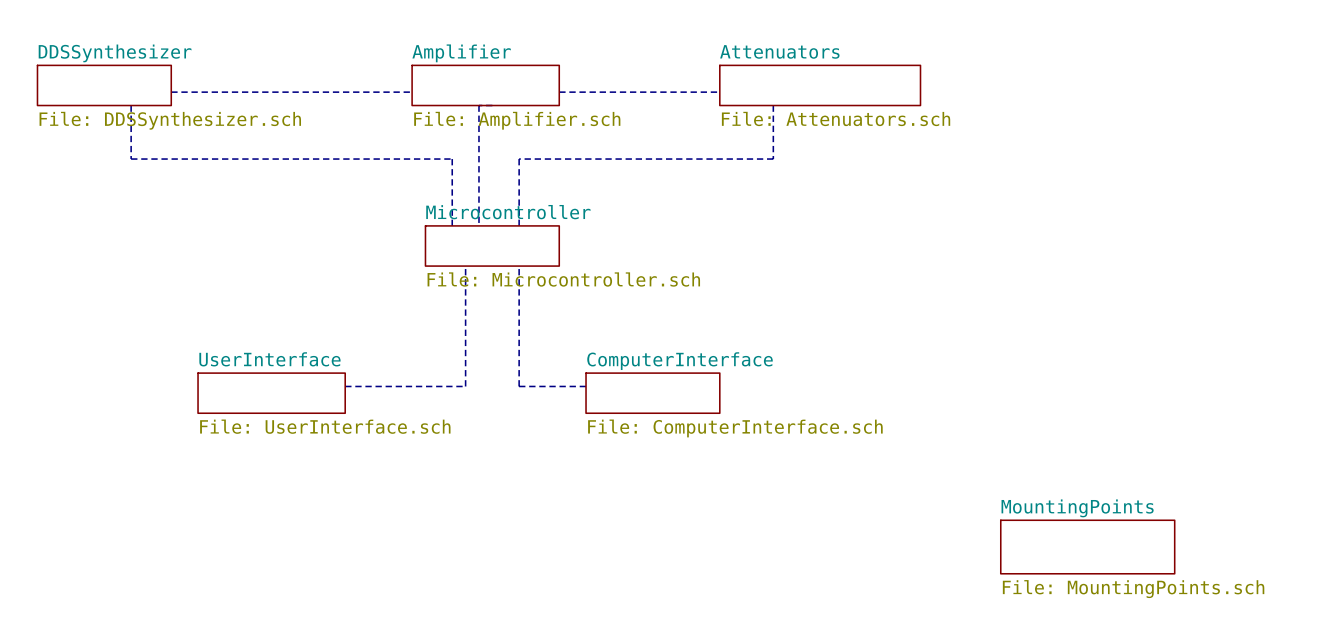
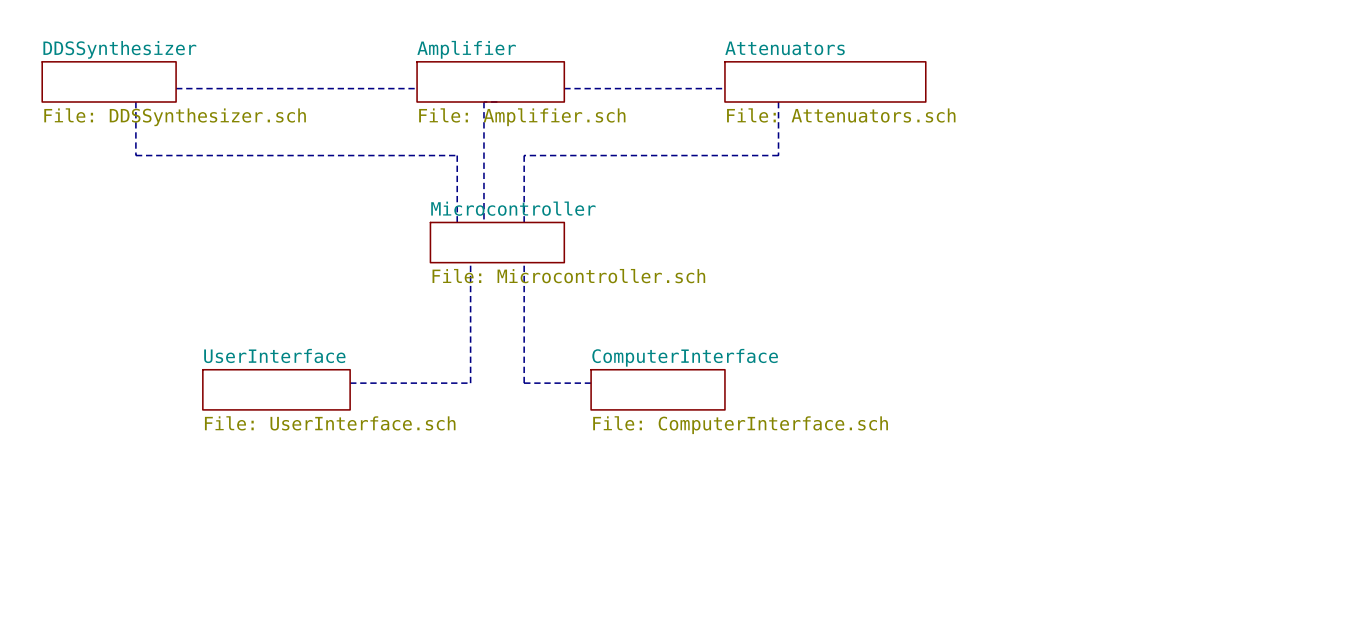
sheet MountingPoints: File: MountingPoints.sch (1087, 547) -> none

